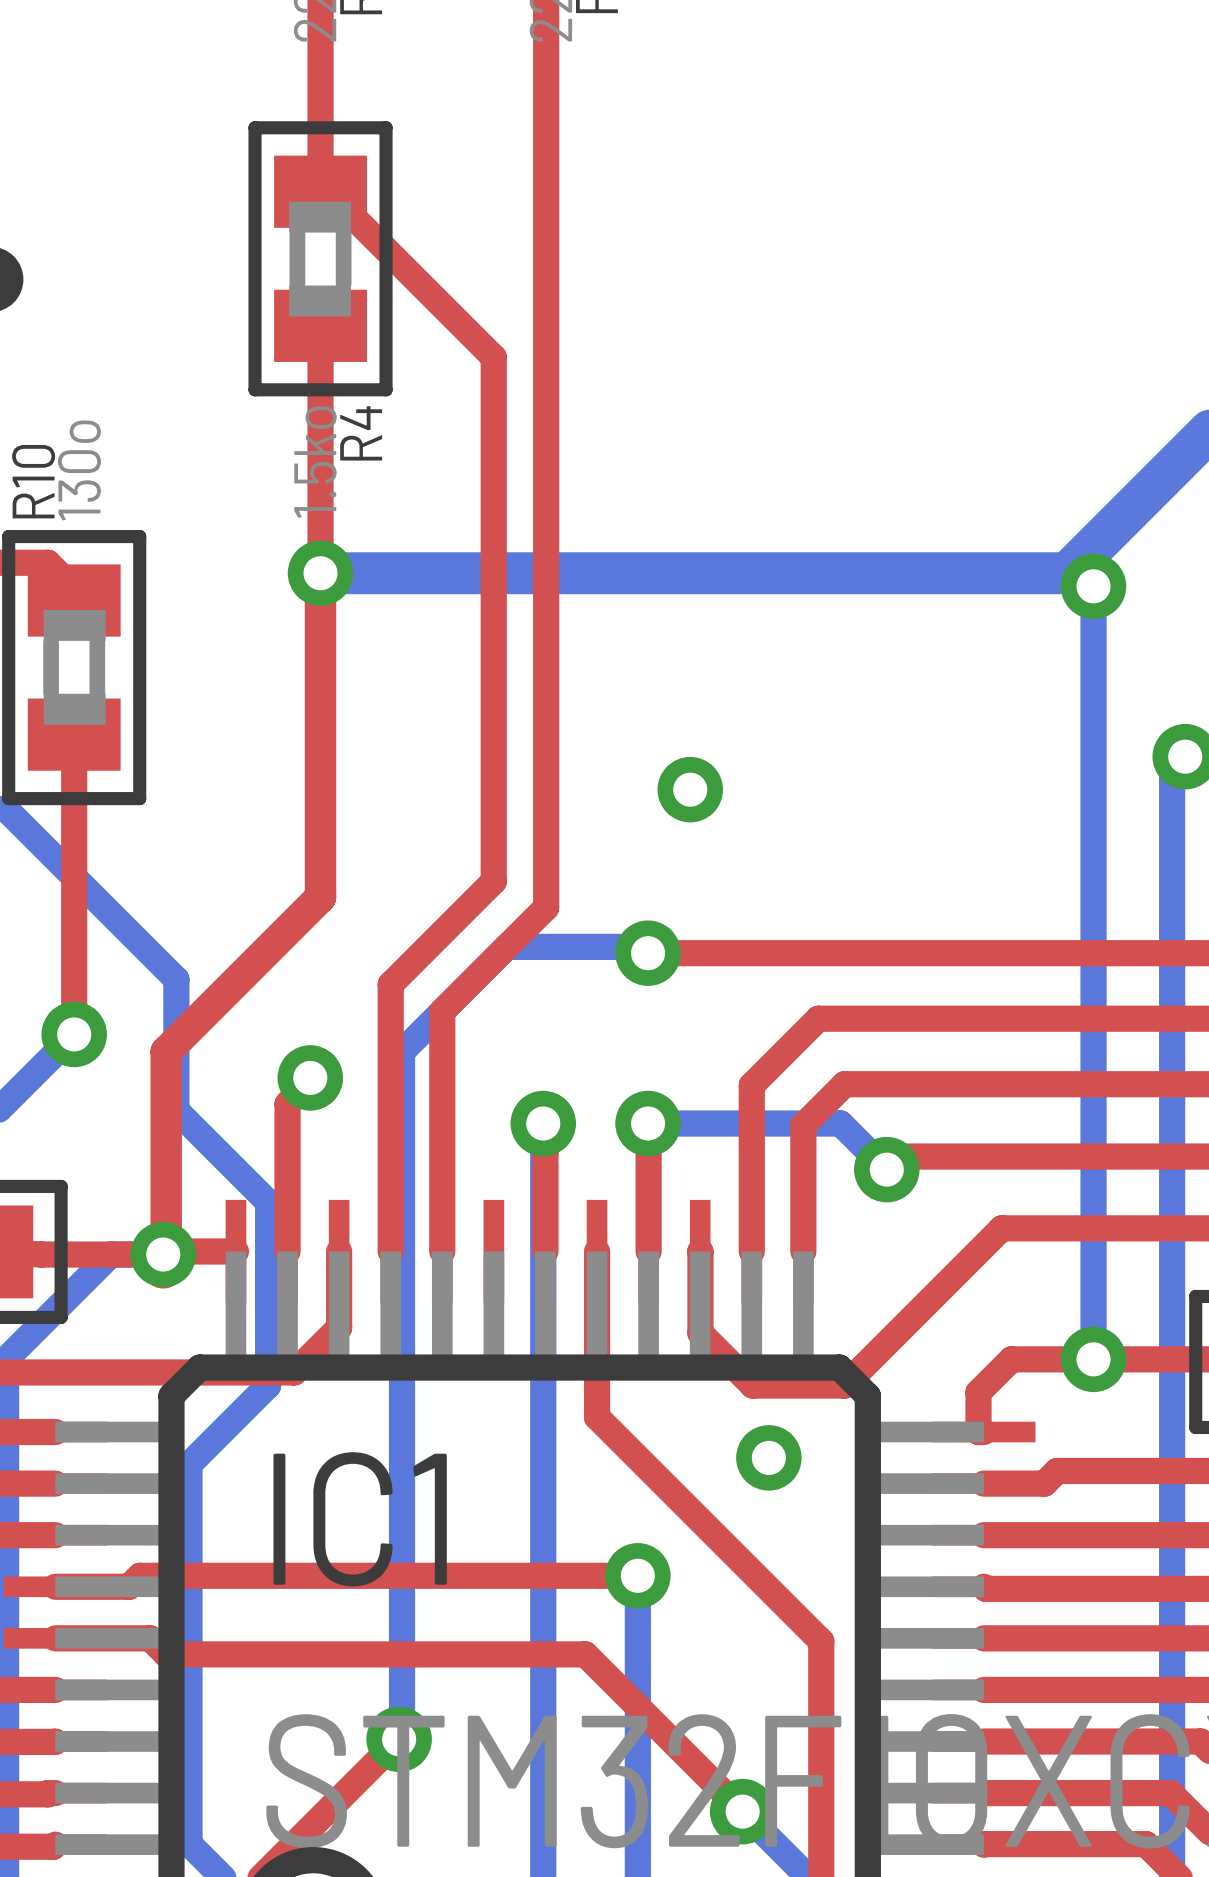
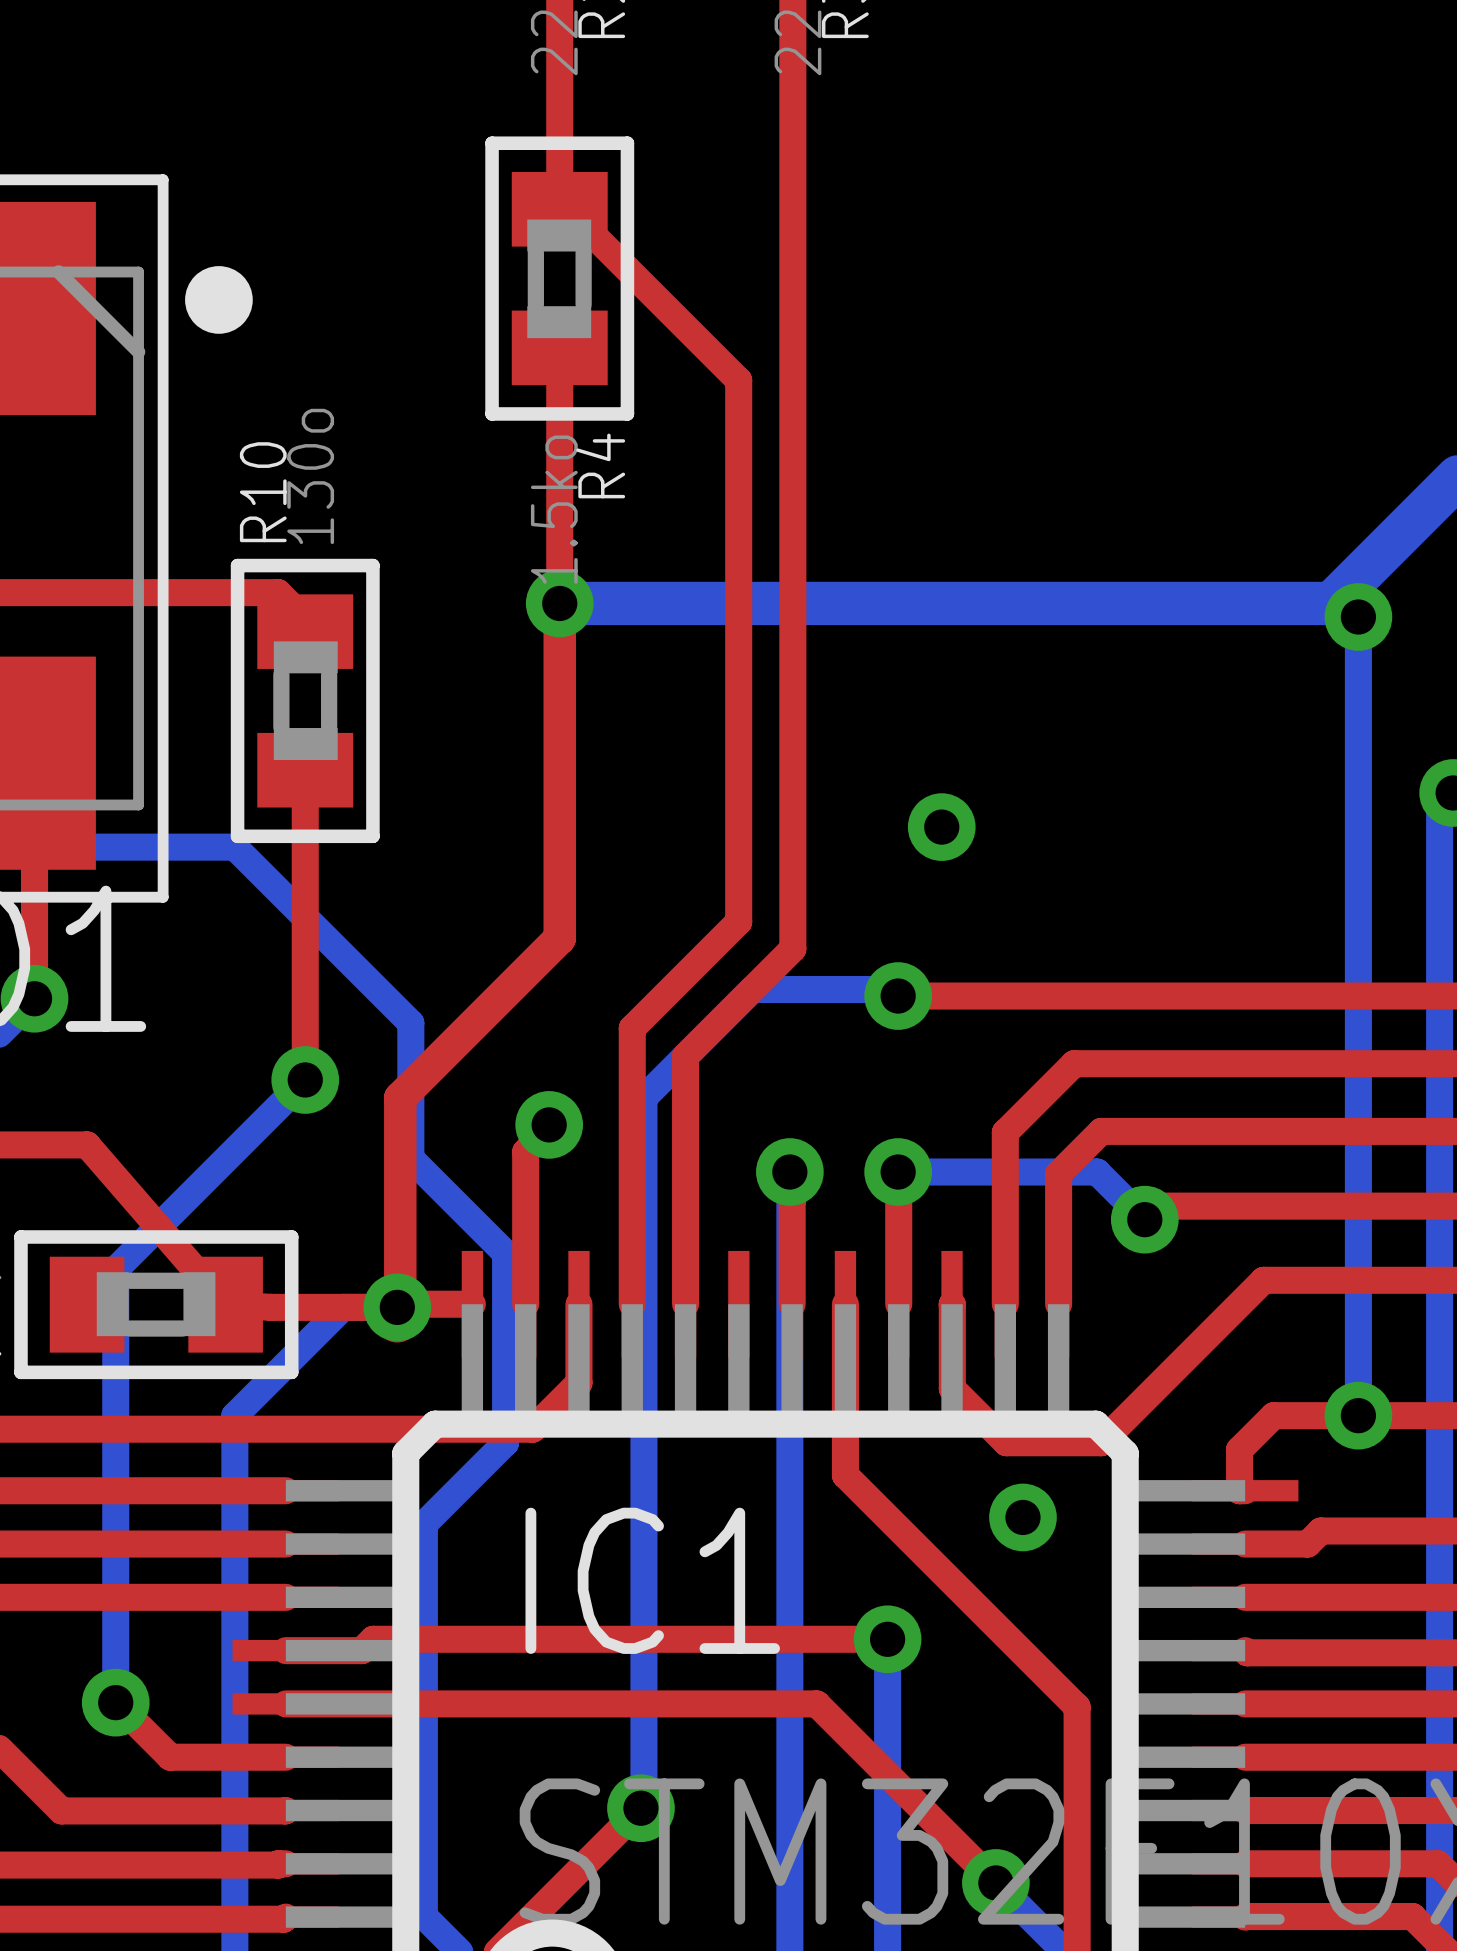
top track: (150, 1638) (166, 1654) (585, 1654) -> (383, 1703) (816, 1703) (833, 1720)

